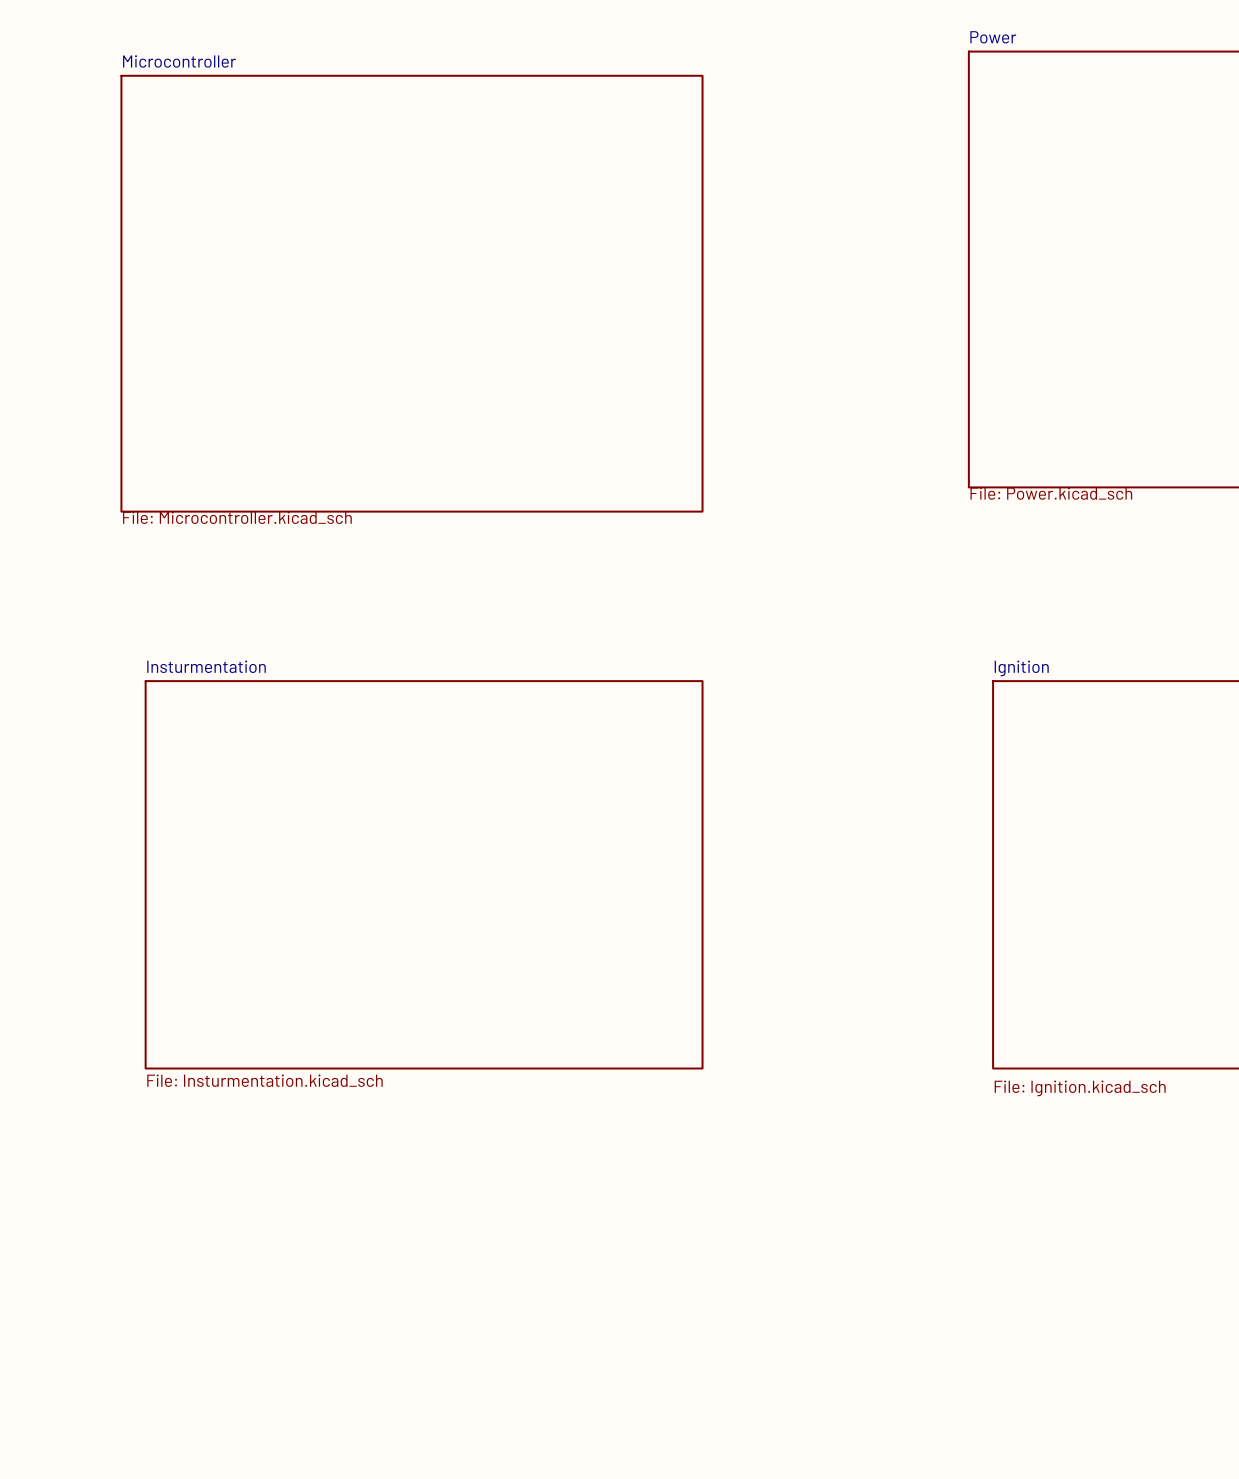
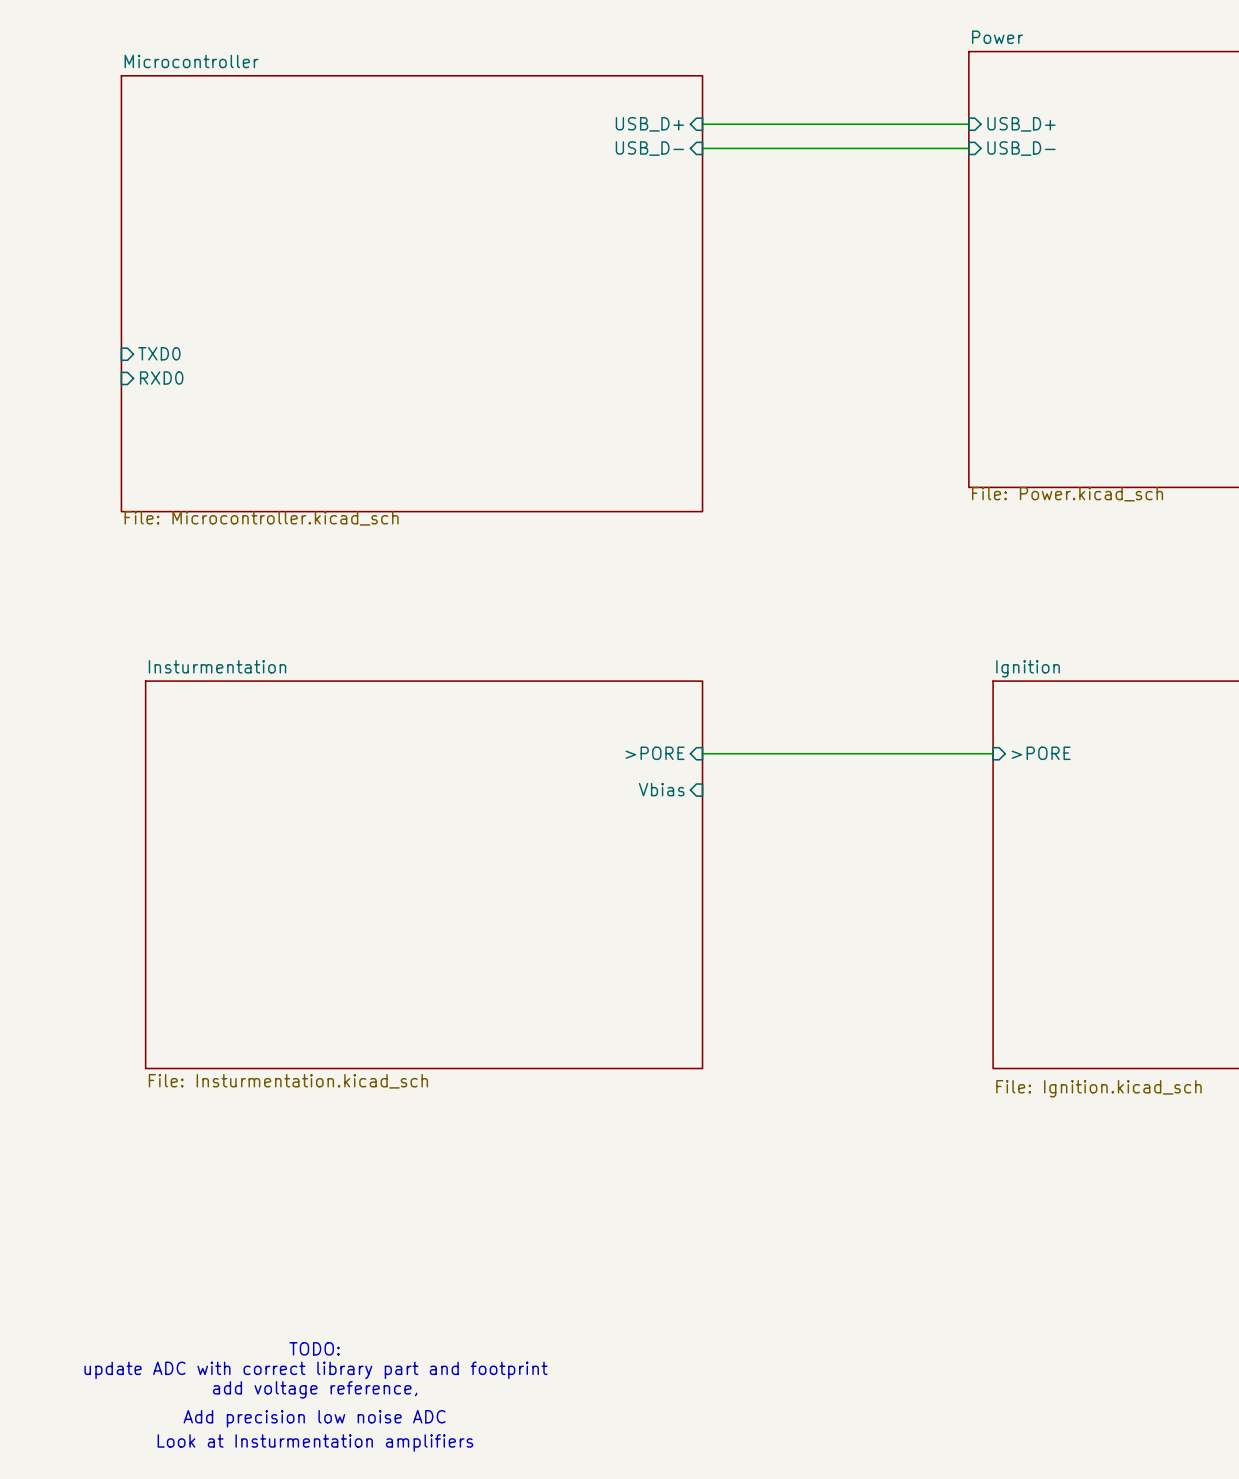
sheet pin: none -> USB_D+ (649, 124)
sheet pin: none -> USB_D+ (1021, 124)
wire: none -> (702, 124) (968, 124)
sheet pin: none -> USB_D- (649, 148)
sheet pin: none -> USB_D- (1021, 148)
wire: none -> (702, 148) (968, 148)
sheet pin: none -> TXD0 (159, 353)
sheet pin: none -> RXD0 (161, 377)
sheet pin: none -> >PORE (655, 753)
wire: none -> (702, 753) (993, 753)
sheet pin: none -> >PORE (1041, 753)
sheet pin: none -> Vbias (661, 789)
text: none -> TODO: (314, 1348)
text: none -> update ADC with correct library part and footprint (315, 1370)
text: none -> add voltage reference, (315, 1389)
text: none -> Add precision low noise ADC (314, 1418)
text: none -> Look at Insturmentation amplifiers (315, 1442)

